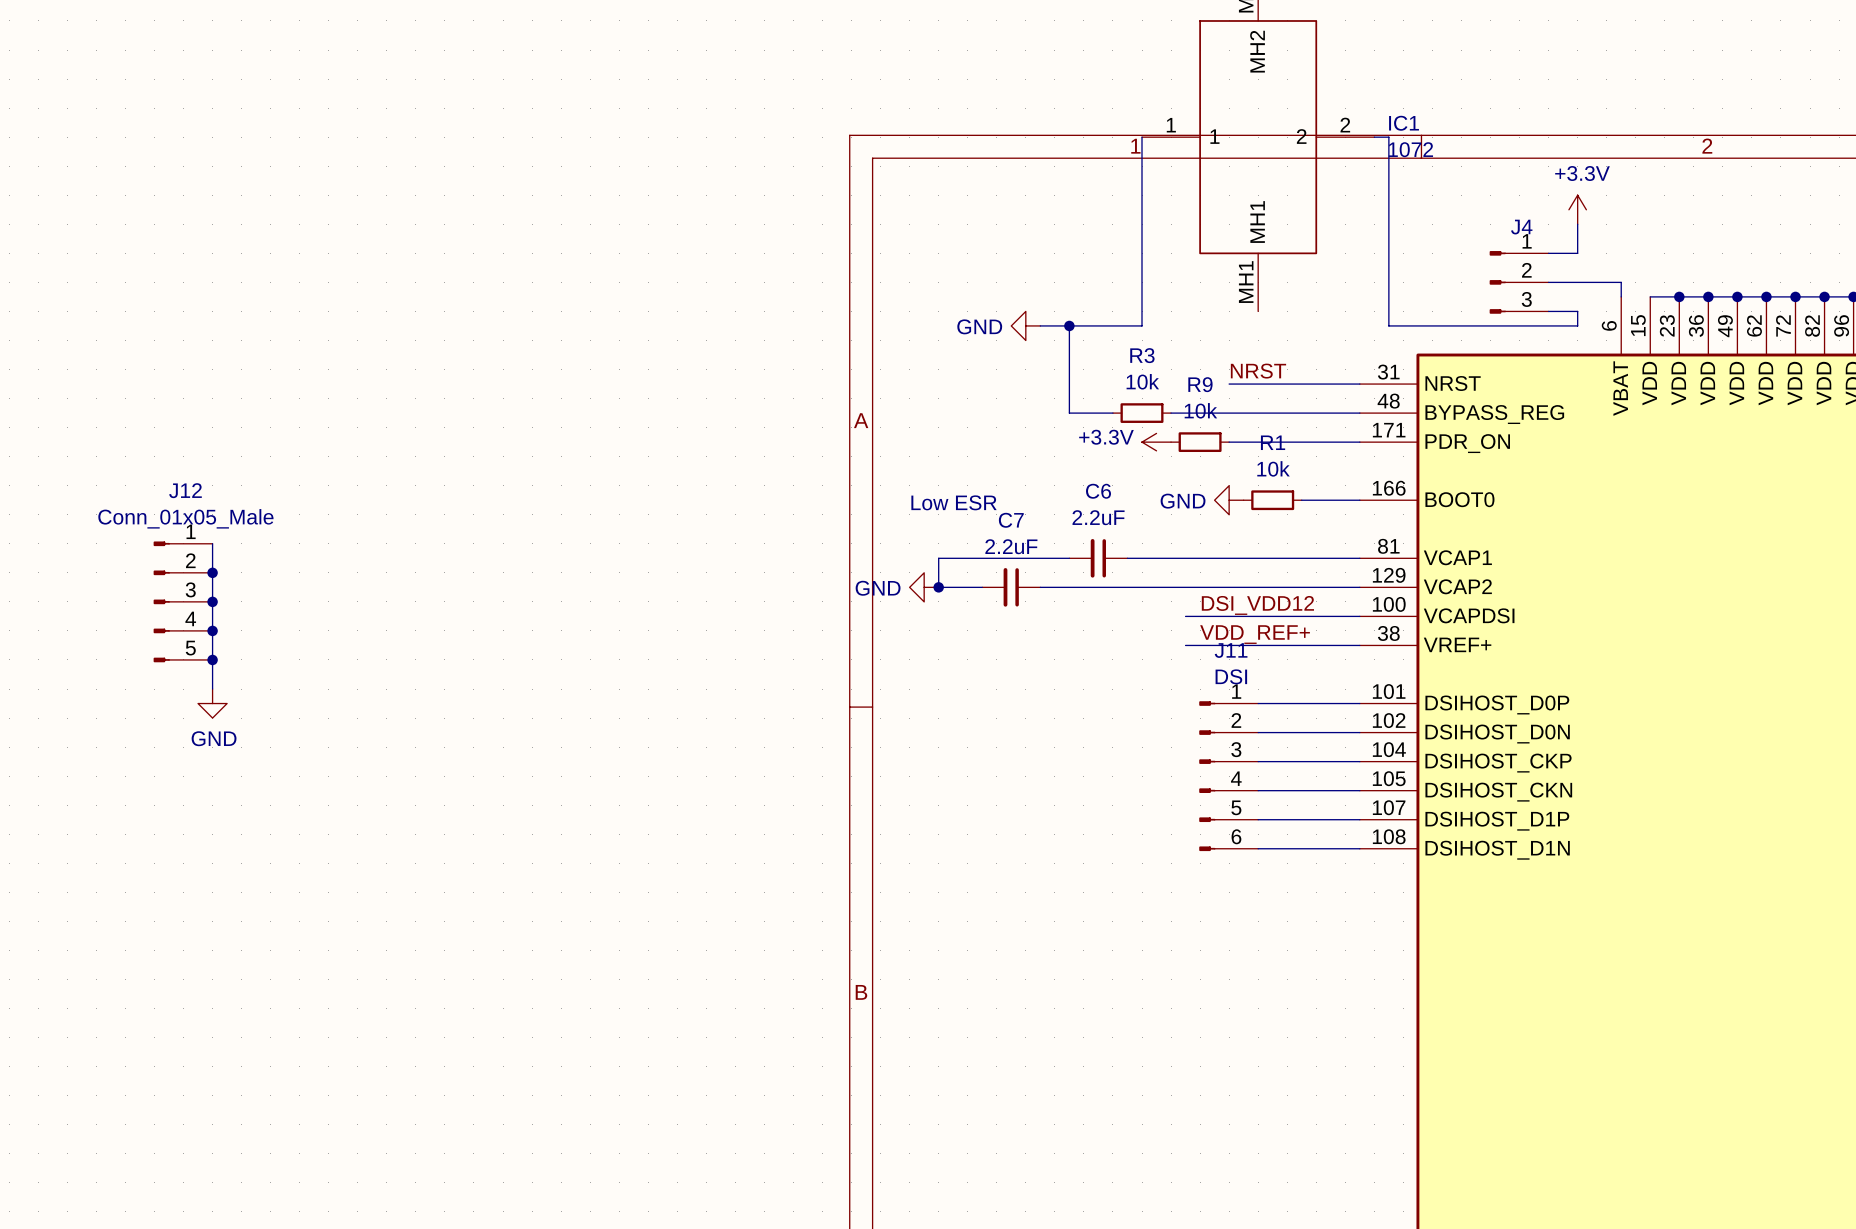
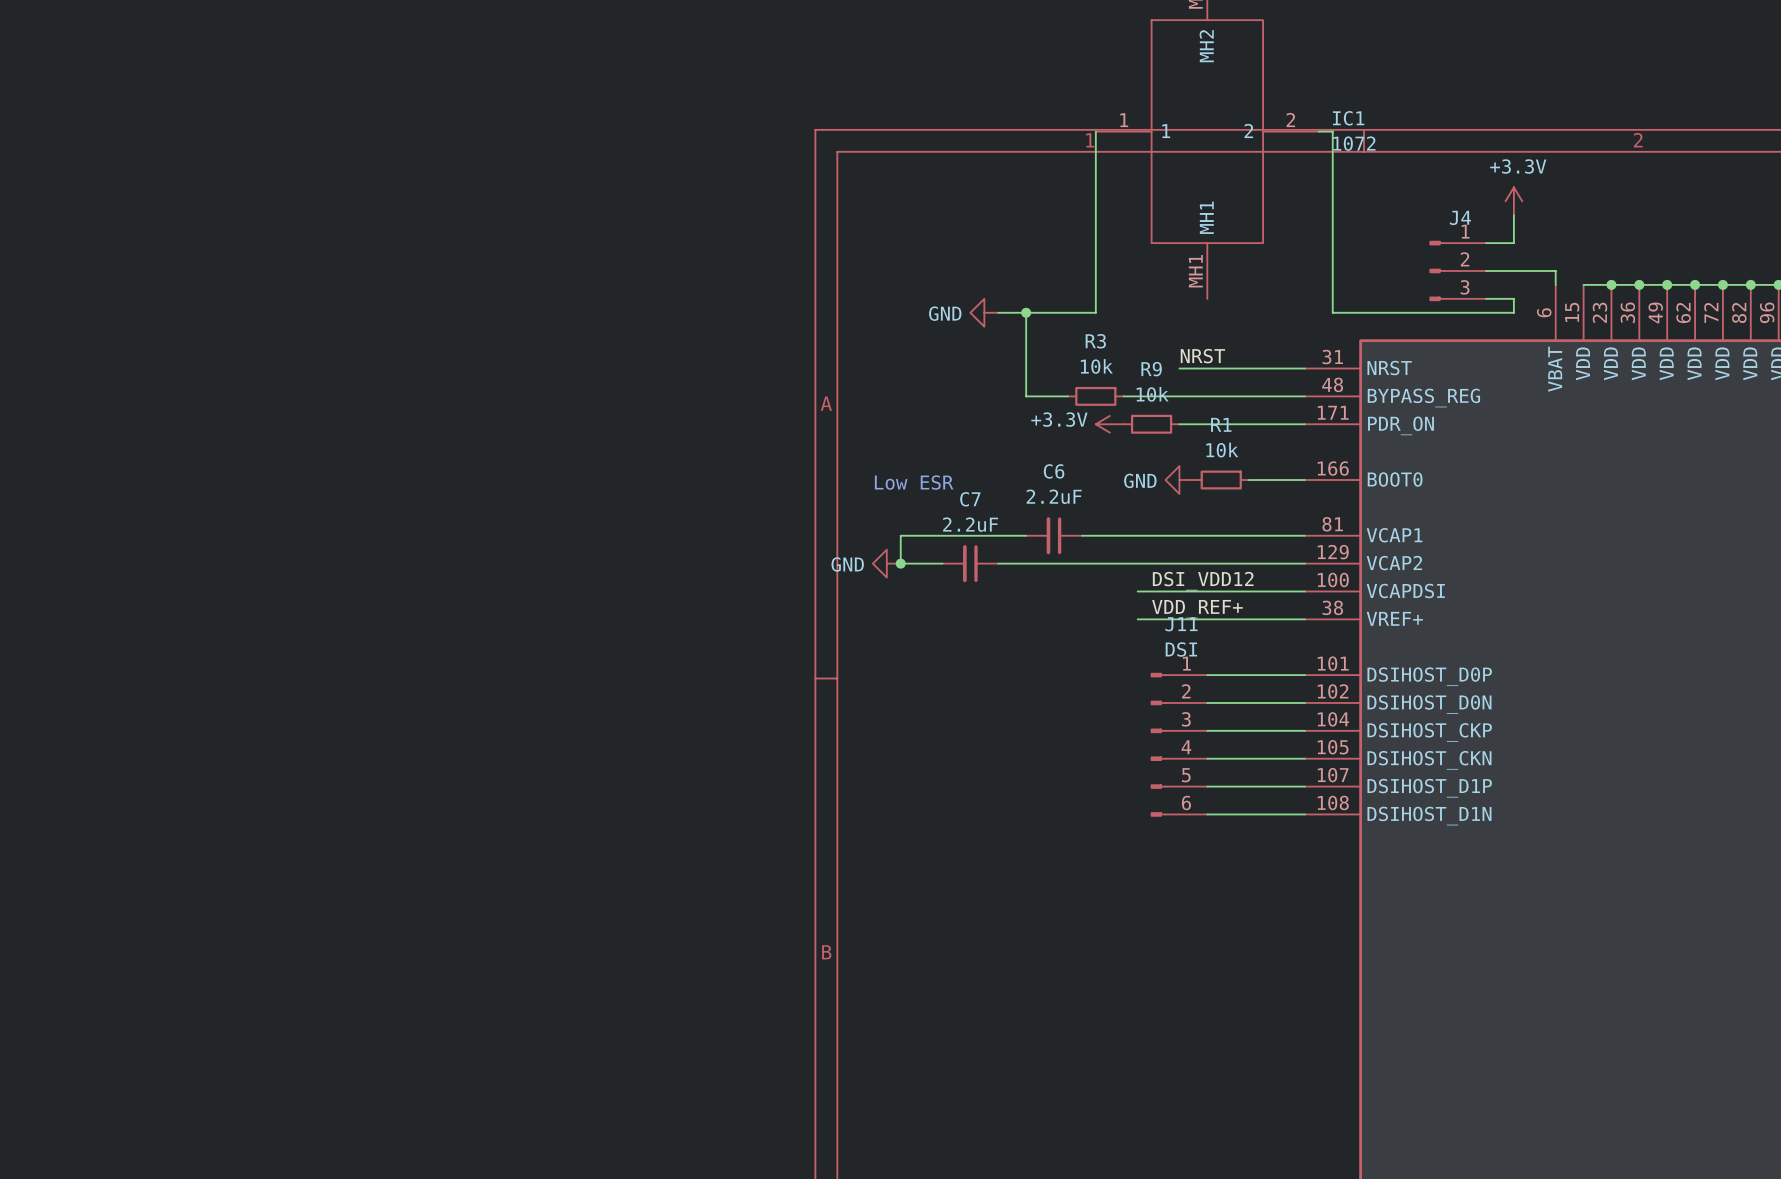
wire: (212, 543) (212, 689) -> none
junction: (212, 572) -> none
J12: Conn_01x05_Male (183, 601) -> none
junction: (212, 601) -> none
junction: (212, 630) -> none
junction: (212, 659) -> none
power symbol: GND (212, 703) -> none

